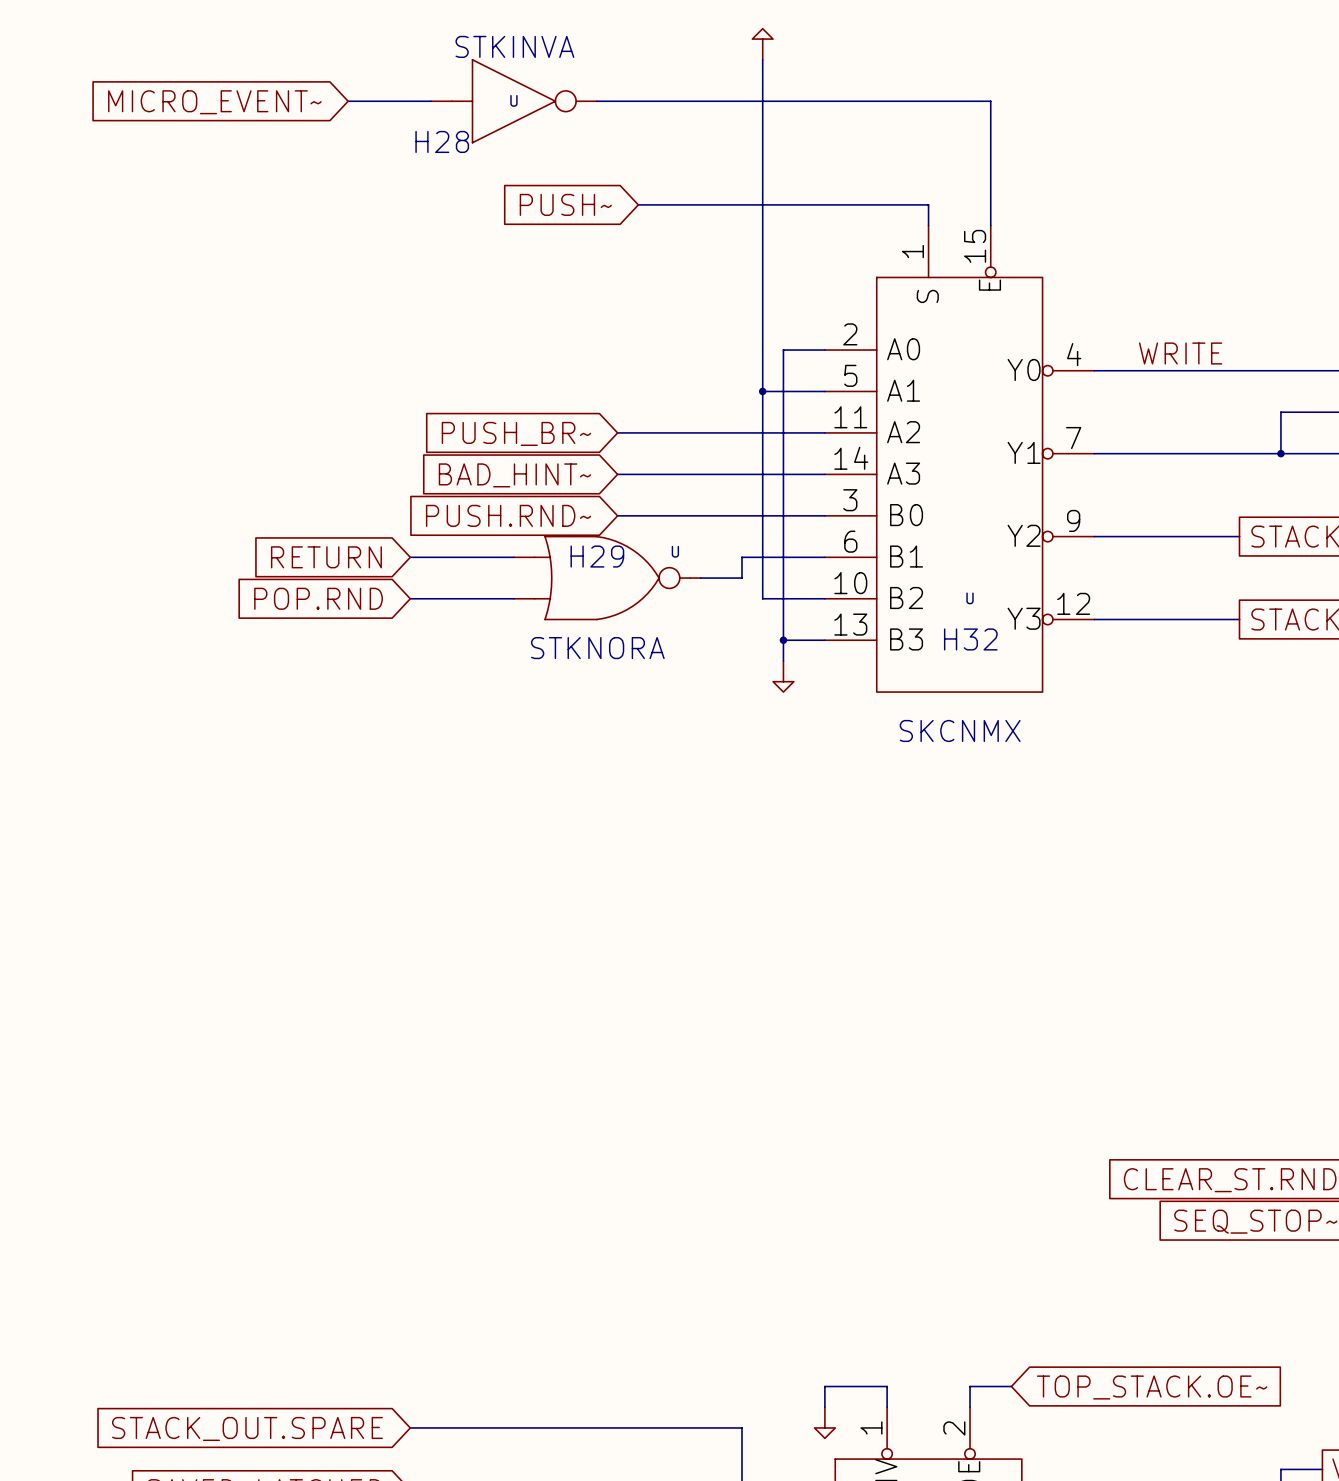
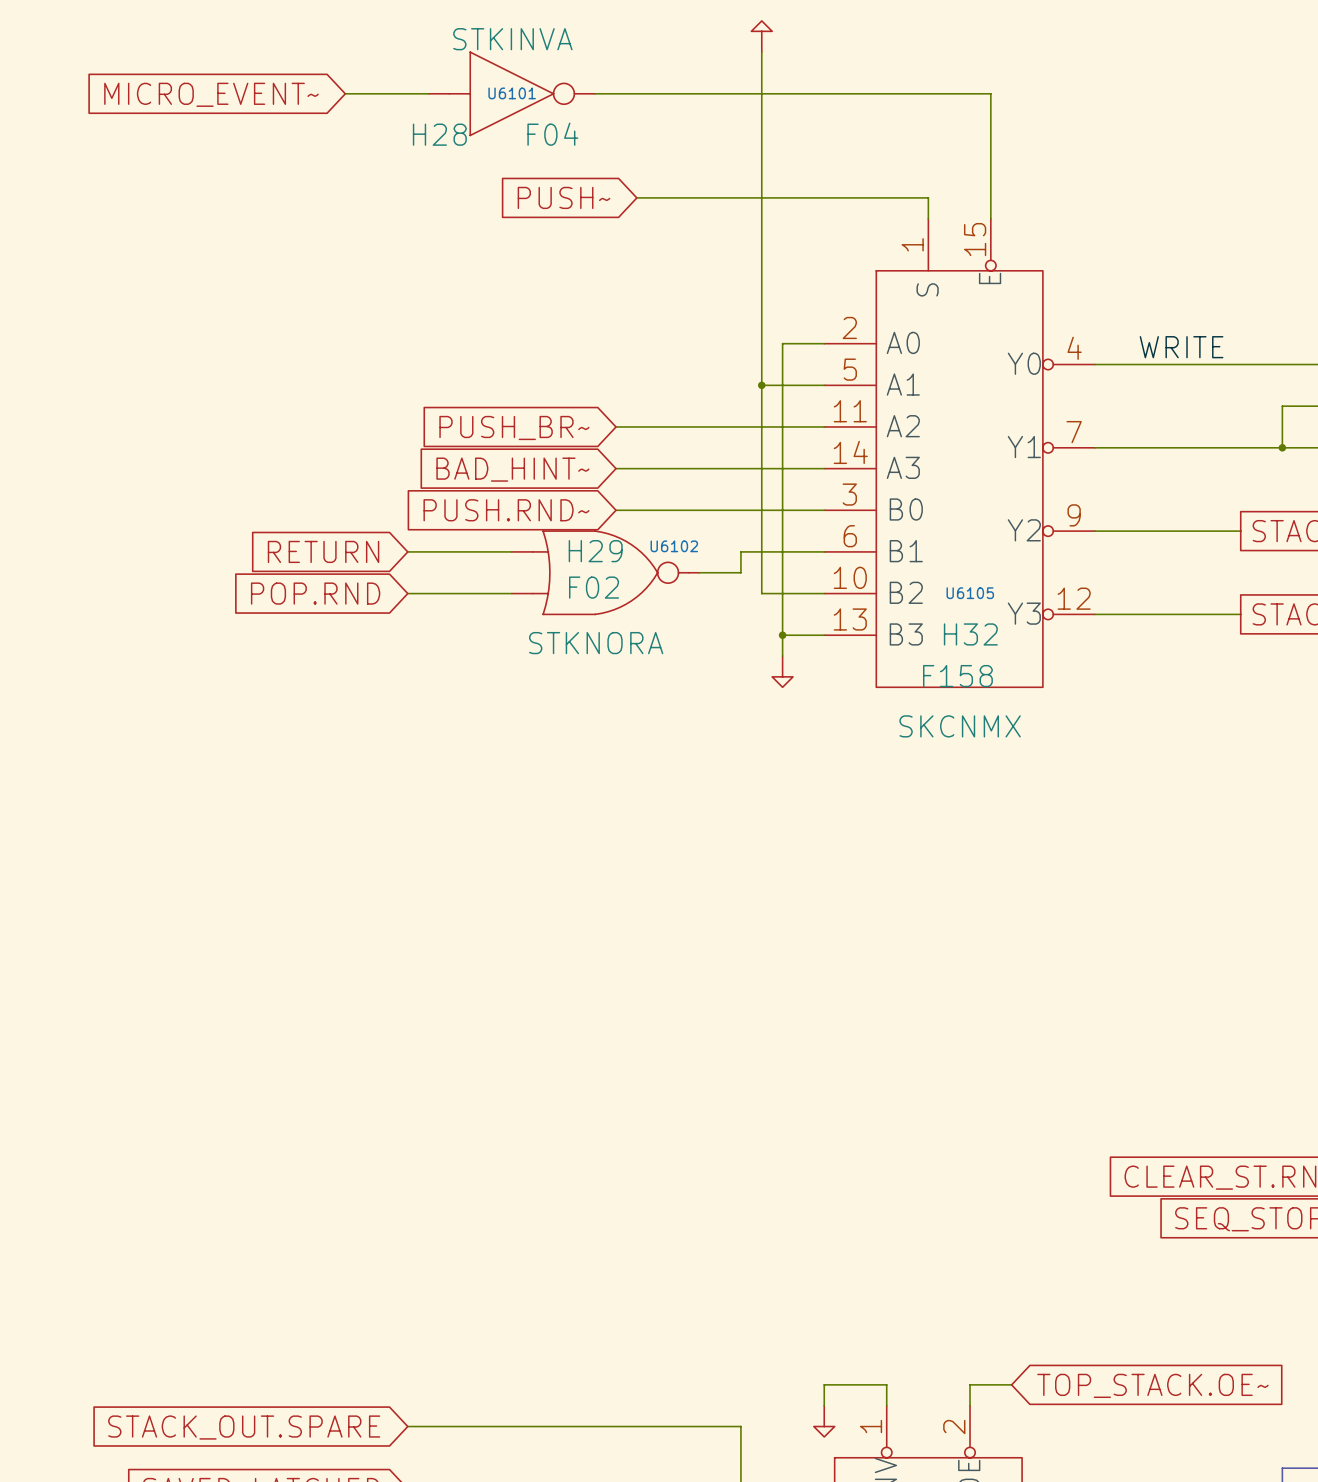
U name: U (513, 100) -> U6101 (512, 93)
U value: none -> F04 (552, 134)
U name: U (675, 551) -> U6102 (674, 546)
U value: none -> F02 (594, 587)
U name: U (970, 598) -> U6105 (970, 593)
U value: none -> F158 (957, 676)

